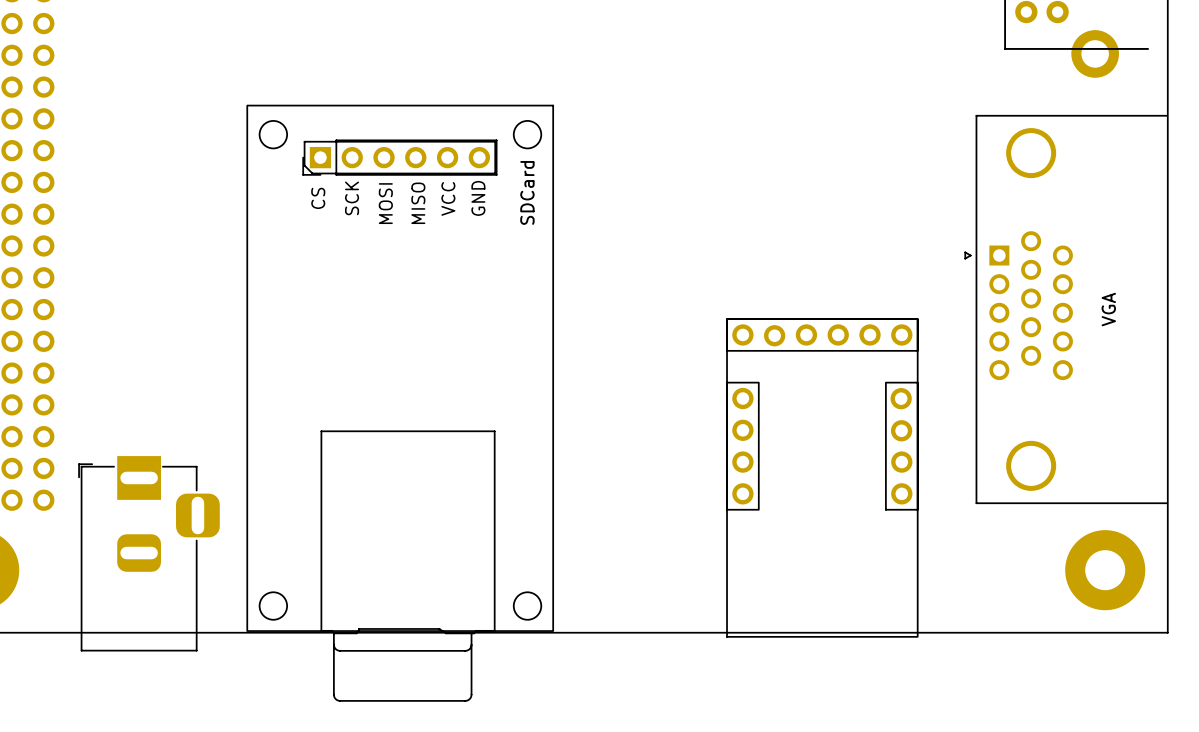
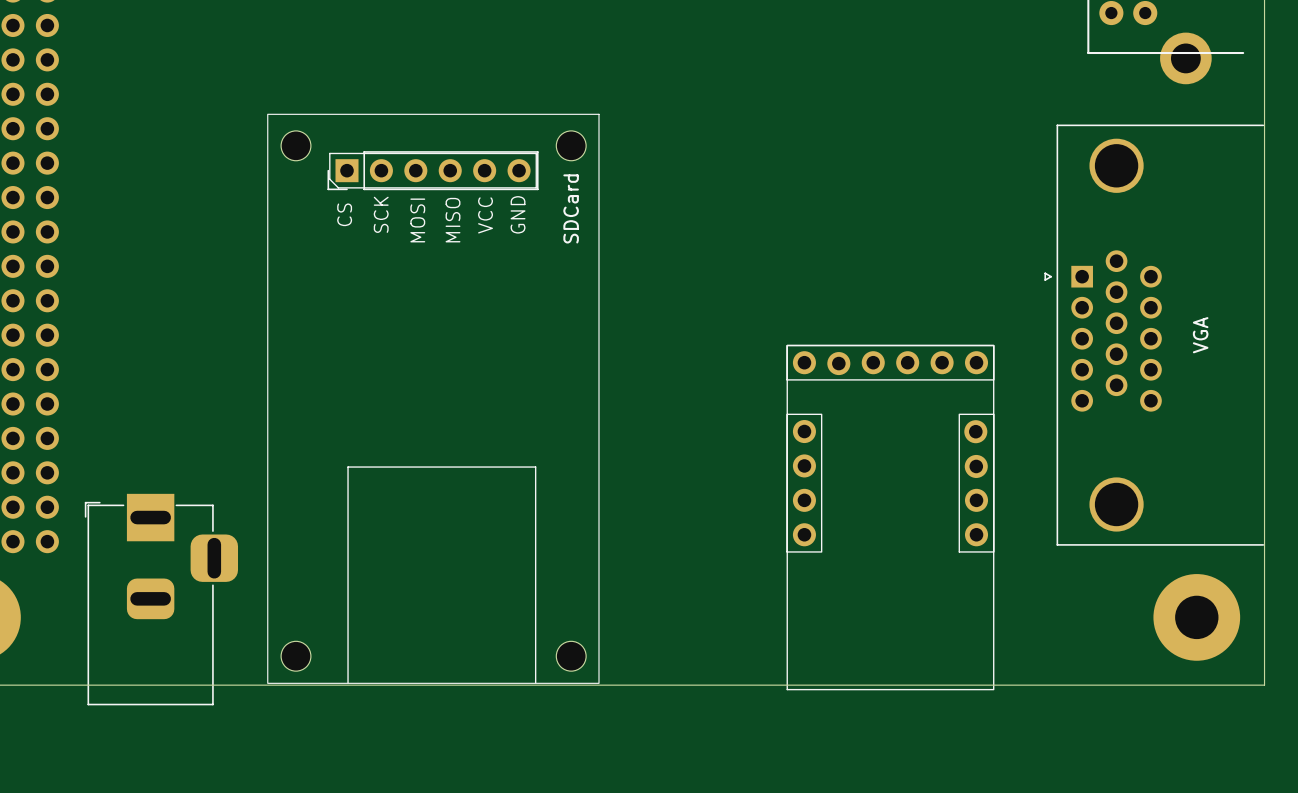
part: none -> SDCard (433, 398)
part: SDCard (400, 403) -> none

